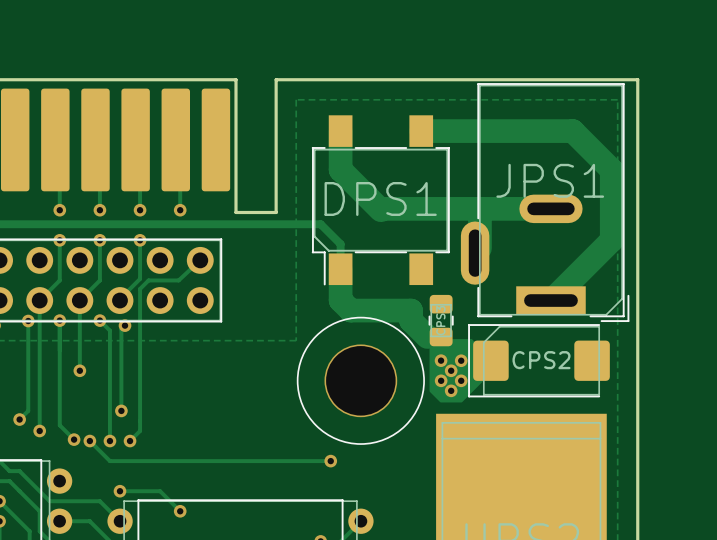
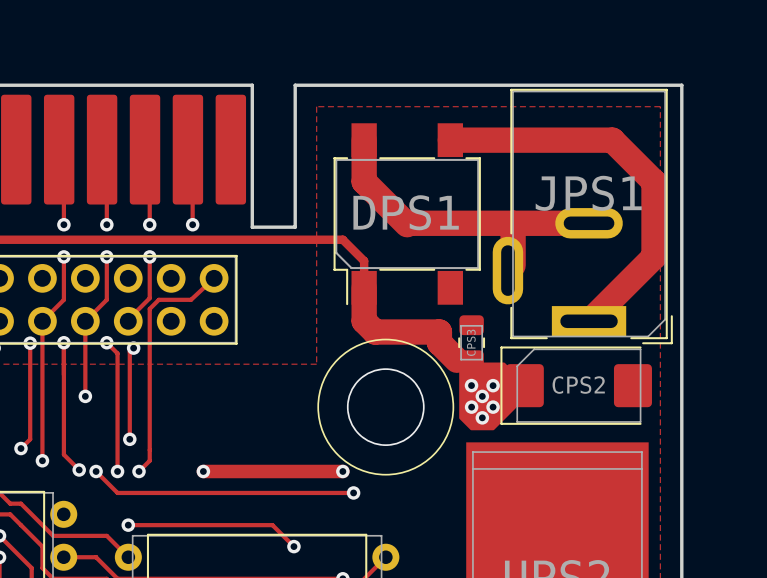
track: none -> (203, 471) (342, 471)
via: none -> (203, 471)
via: none -> (342, 471)
track: (160, 491) (180, 511) -> (171, 525) (272, 525) (293, 546)
via: (180, 511) -> none
via: none -> (293, 546)

